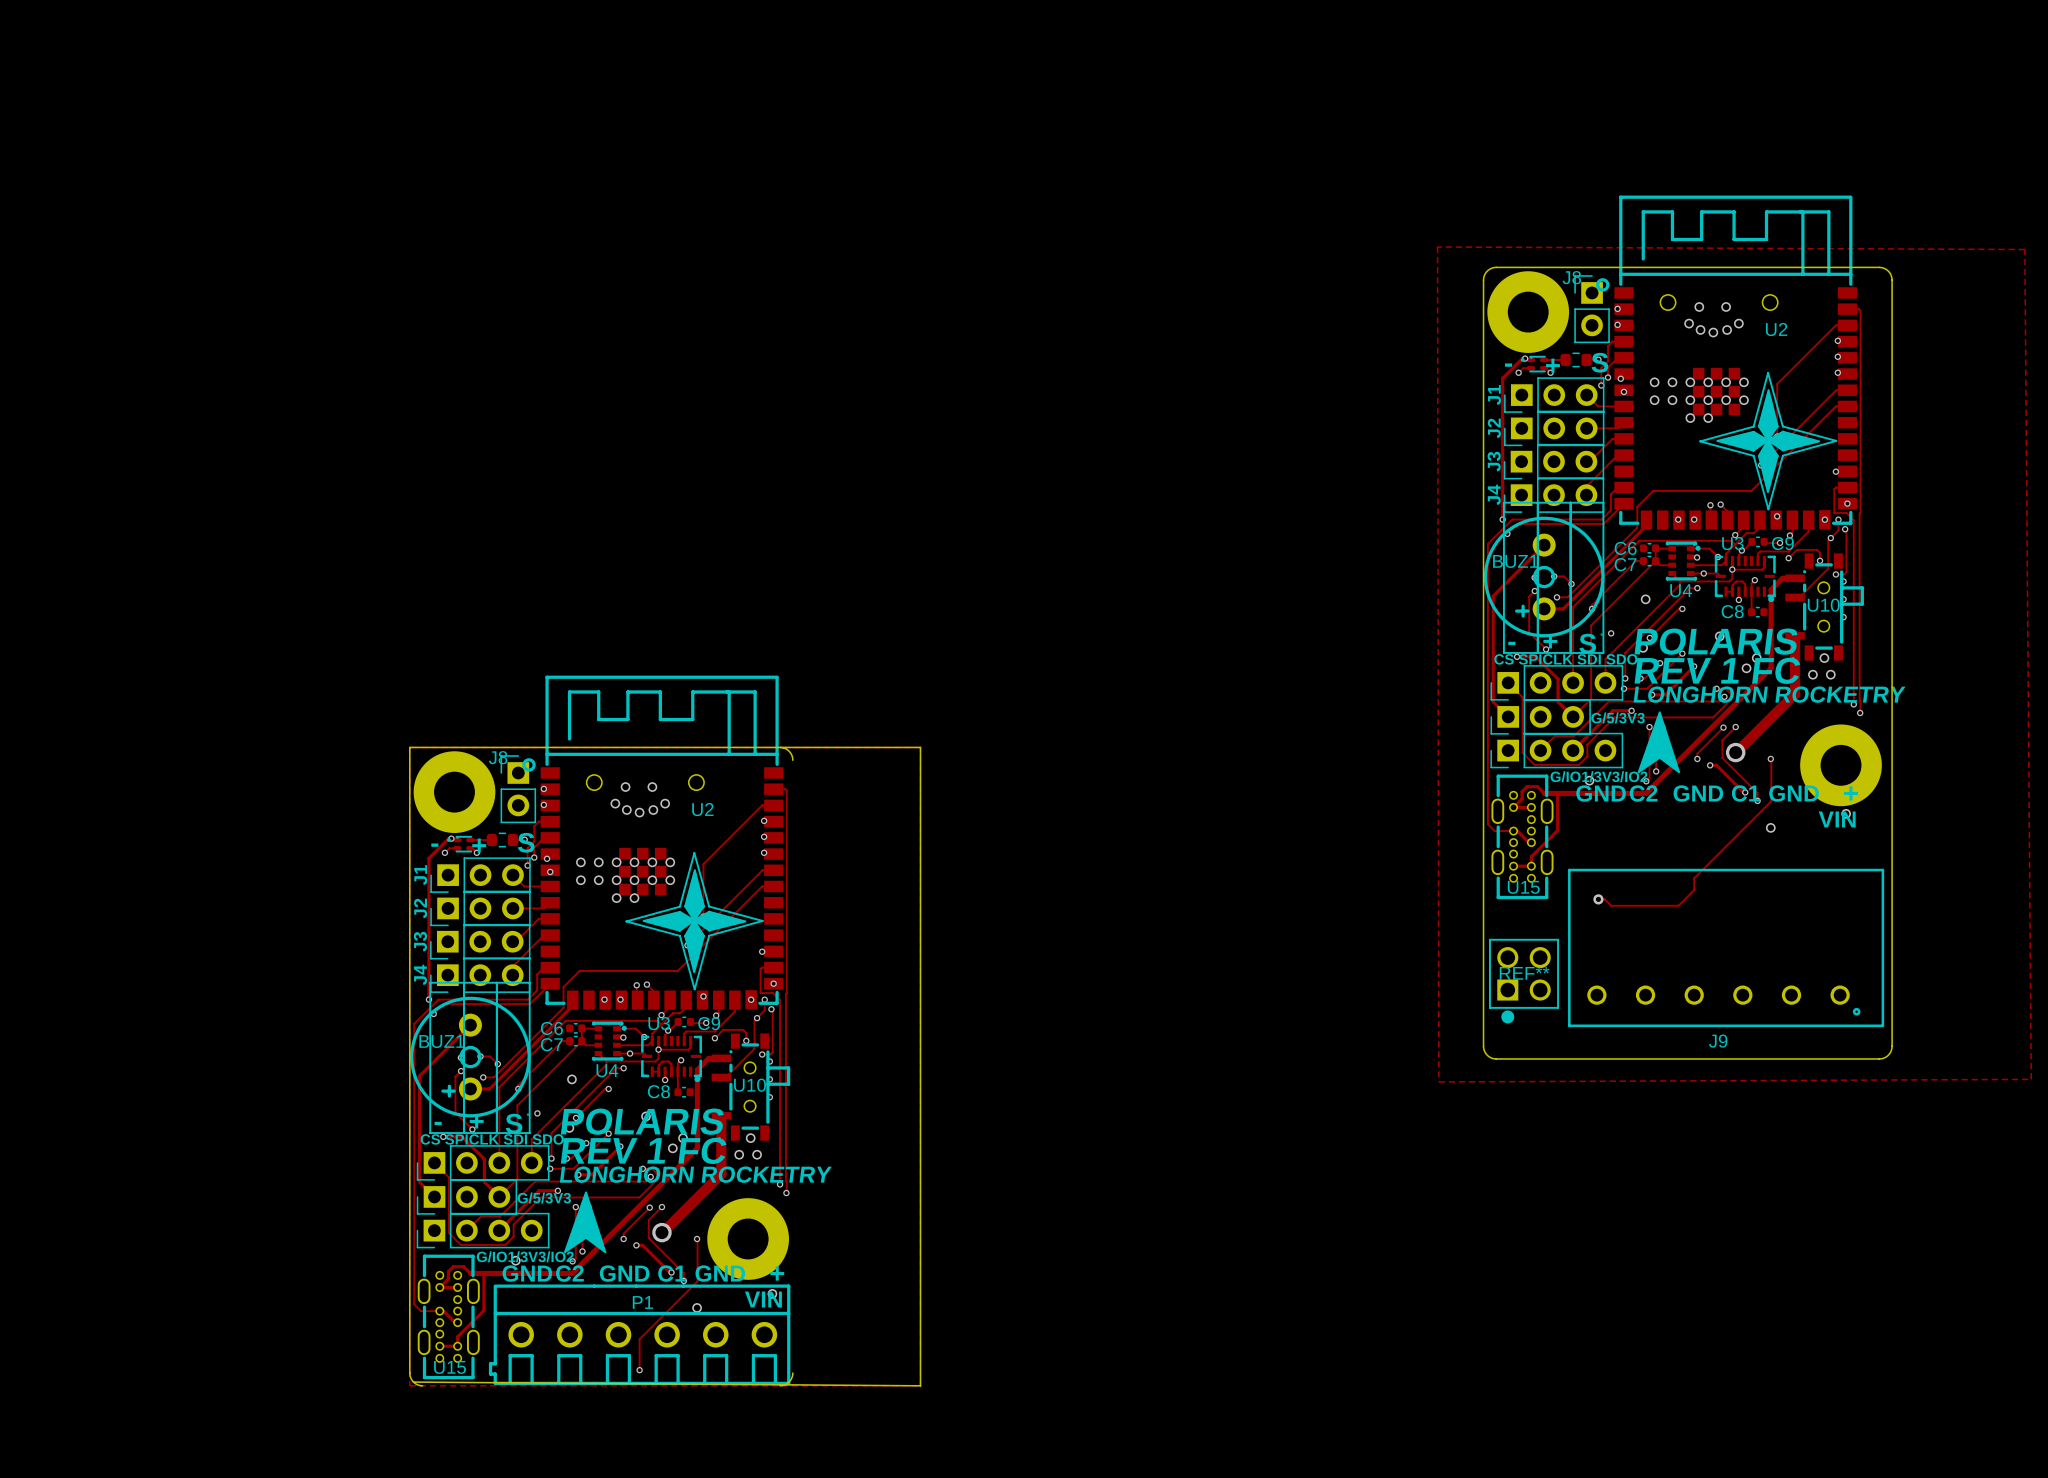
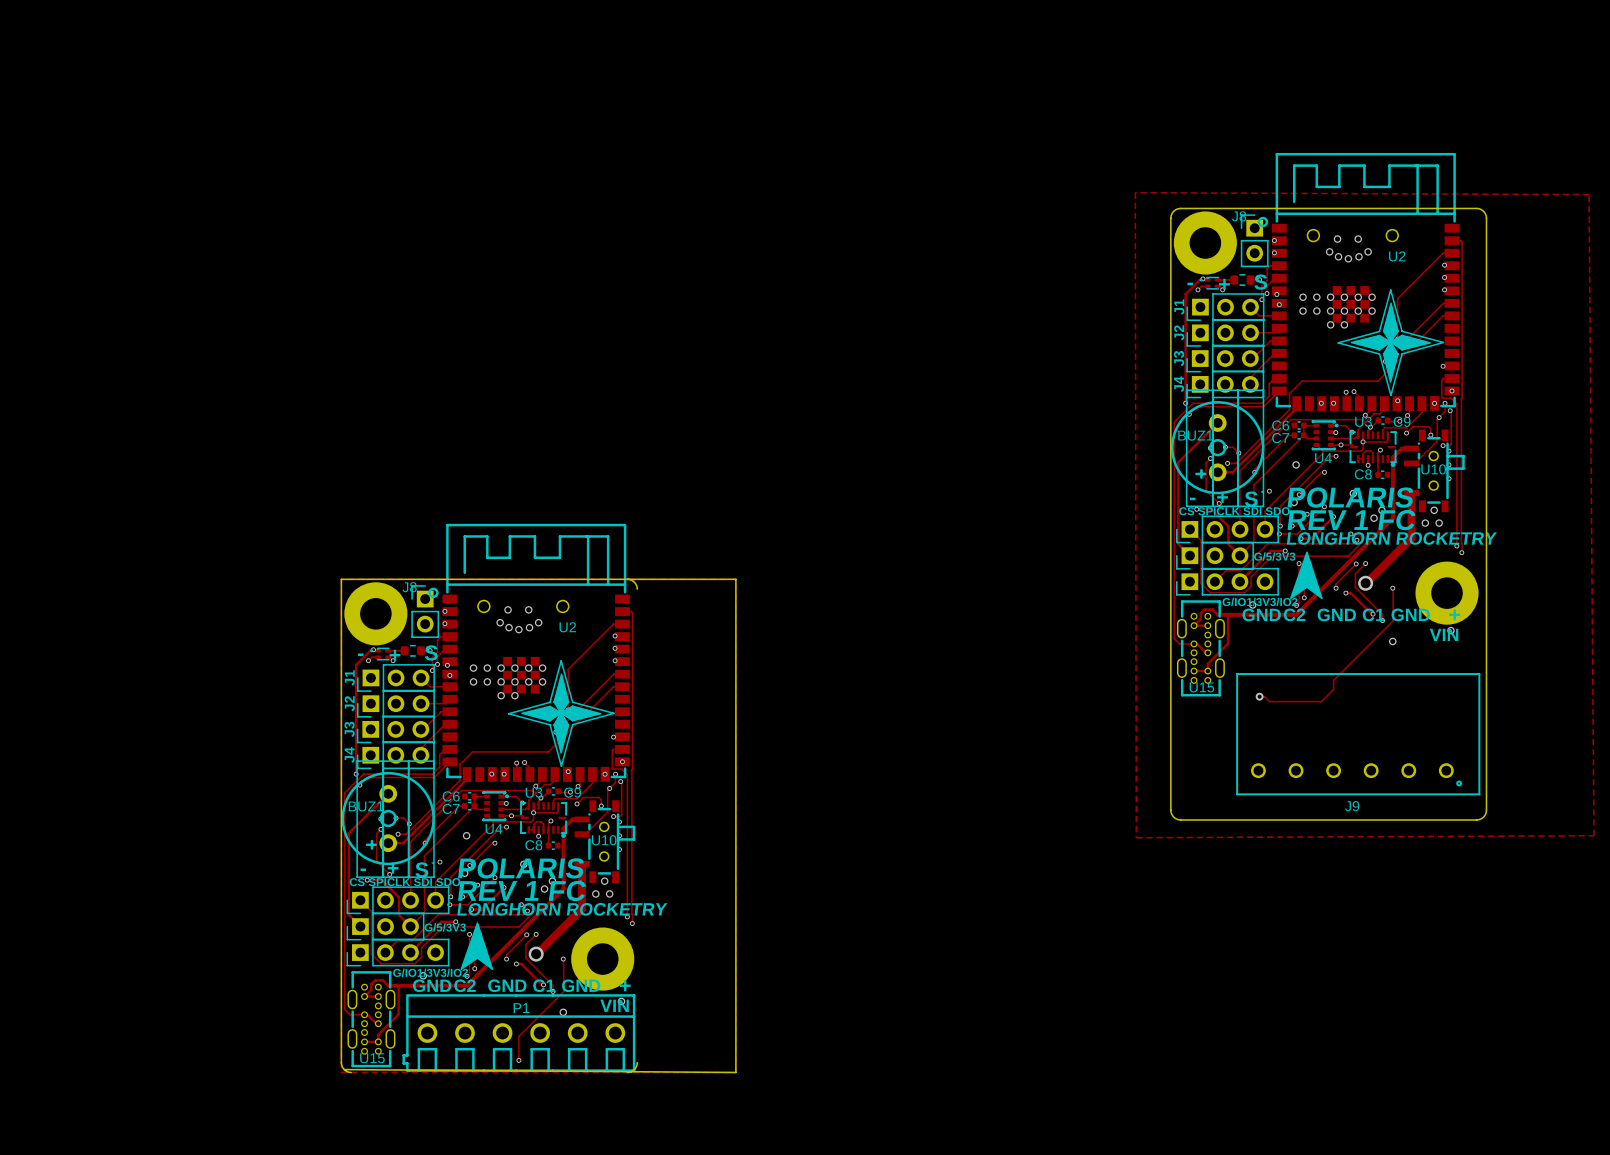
REF**: (1524, 981) -> none

